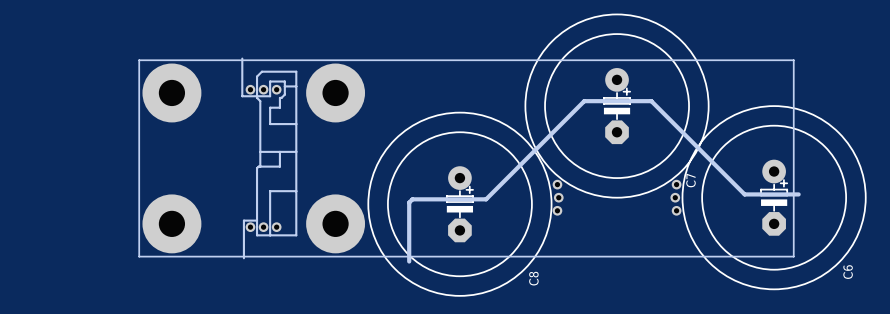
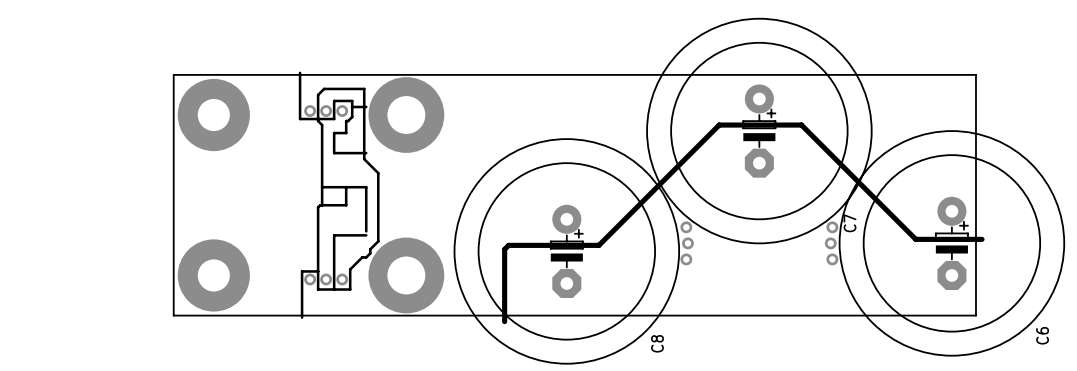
board edge: (294, 71) (296, 71) (296, 151) -> (364, 88) (364, 159) (378, 173) (378, 241) (370, 249) (370, 253) (366, 257) (362, 257) (350, 269) (350, 289)
part: none -> (406, 115)
part: (335, 92) -> none
board edge: (296, 187) (296, 235) (283, 235) -> none
part: none -> (406, 275)
part: (335, 223) -> none

